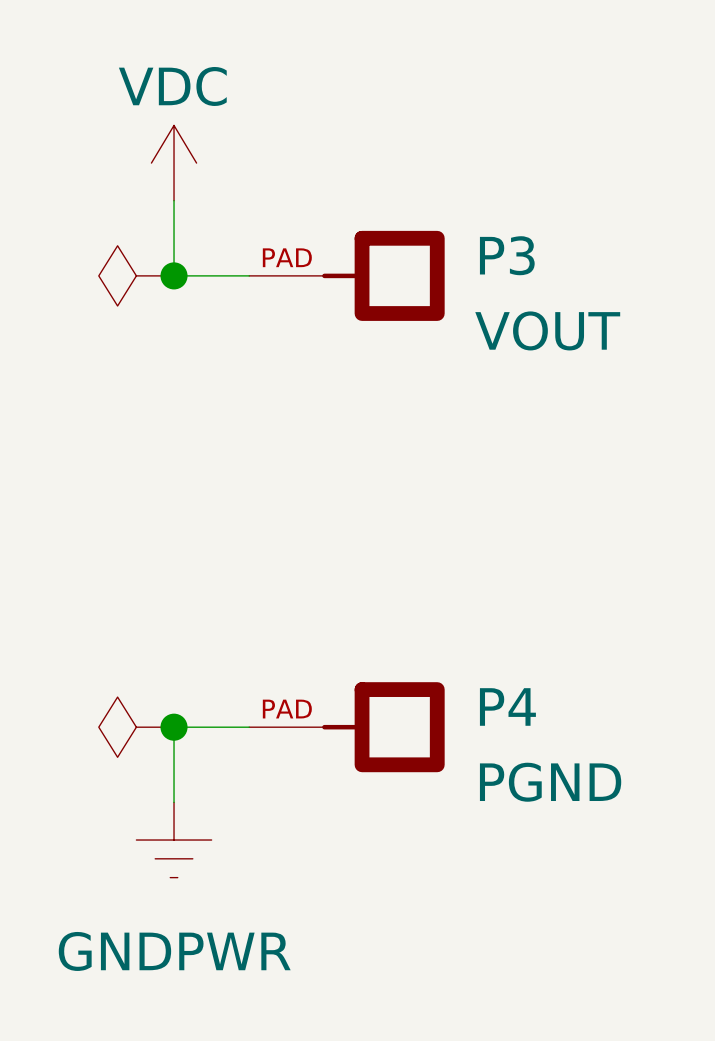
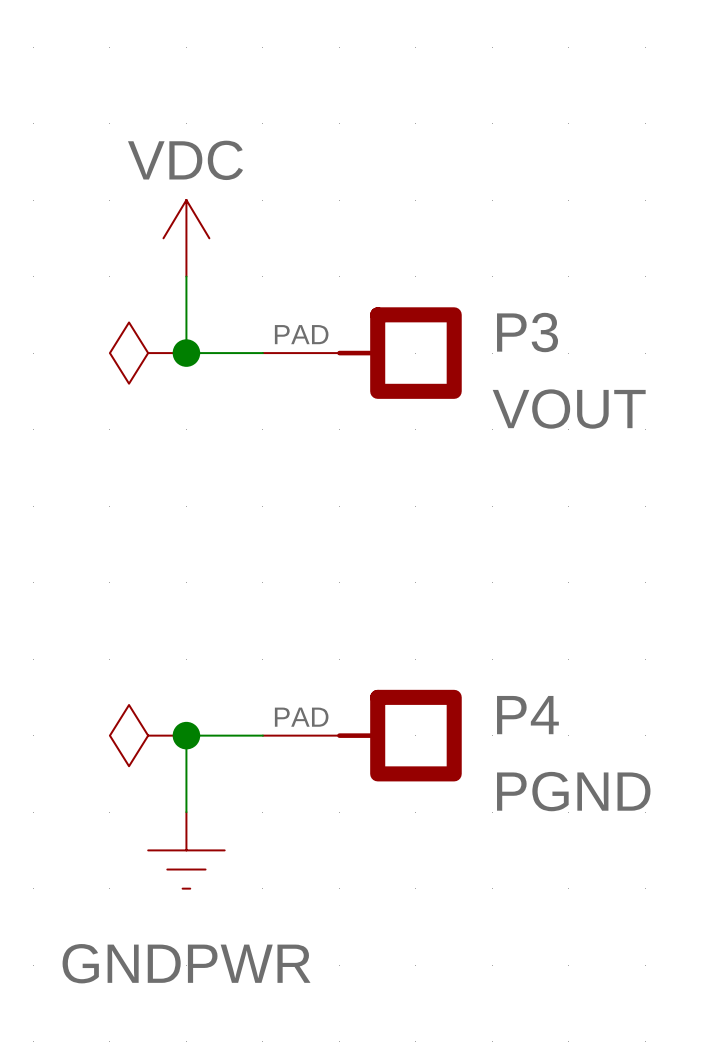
power symbol position: VDC (174, 163) -> VDC (186, 238)
wire: (174, 200) (174, 275) (249, 275) -> (186, 276) (186, 353) (262, 353)
power symbol position: (136, 275) -> (148, 353)
junction position: (174, 275) -> (186, 353)
P3 position: (346, 275) -> (362, 353)

